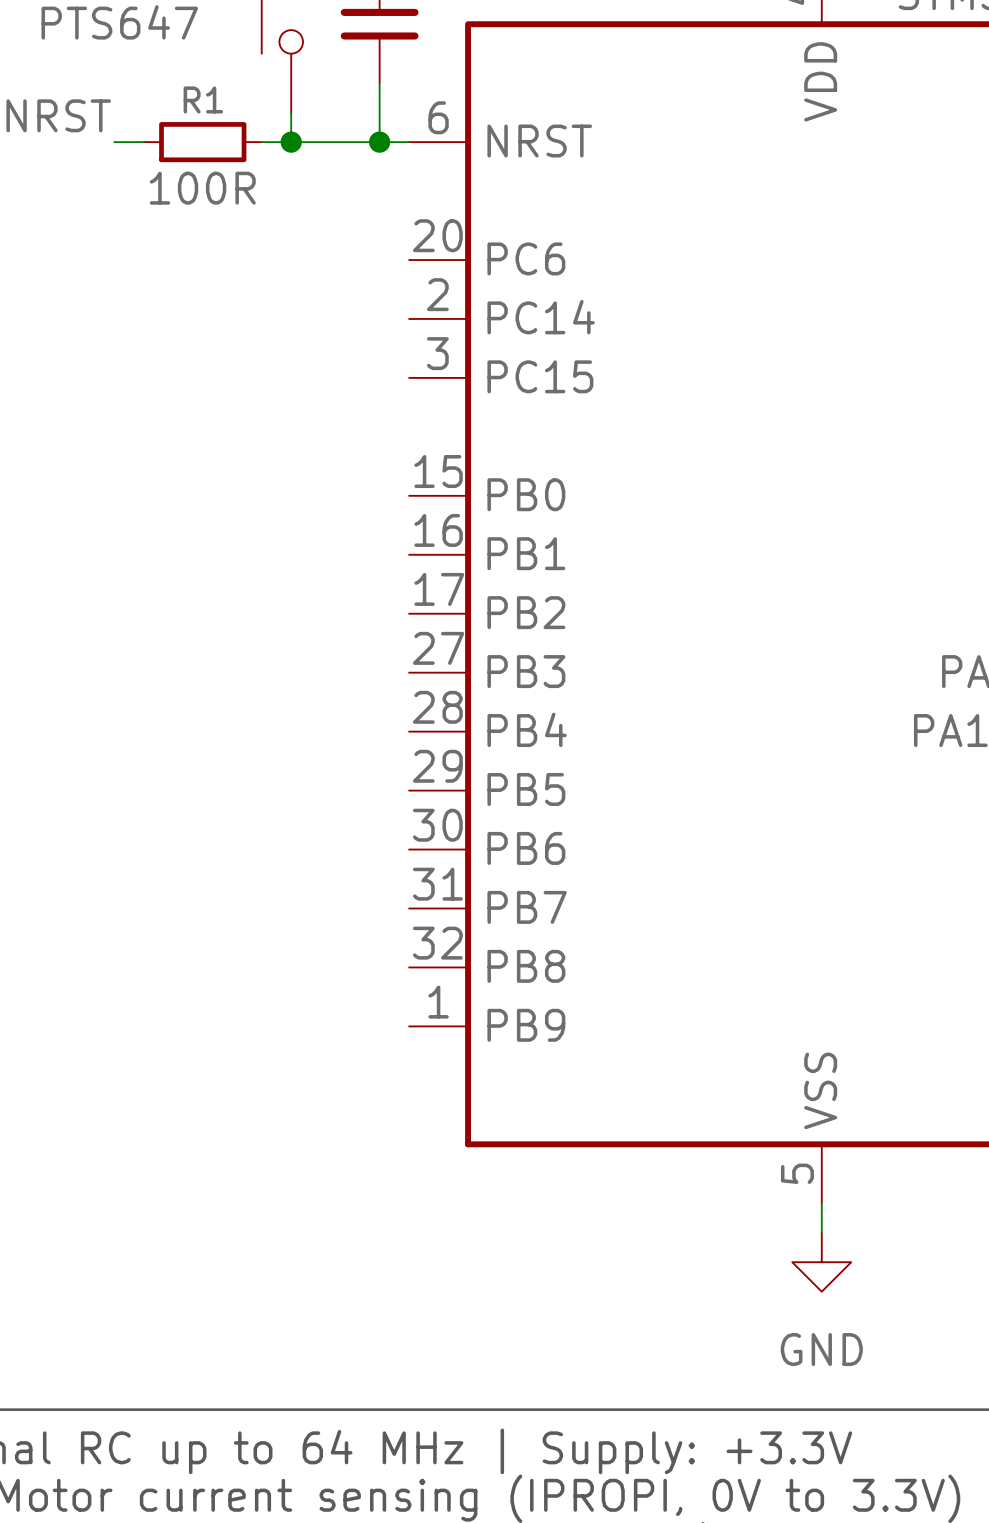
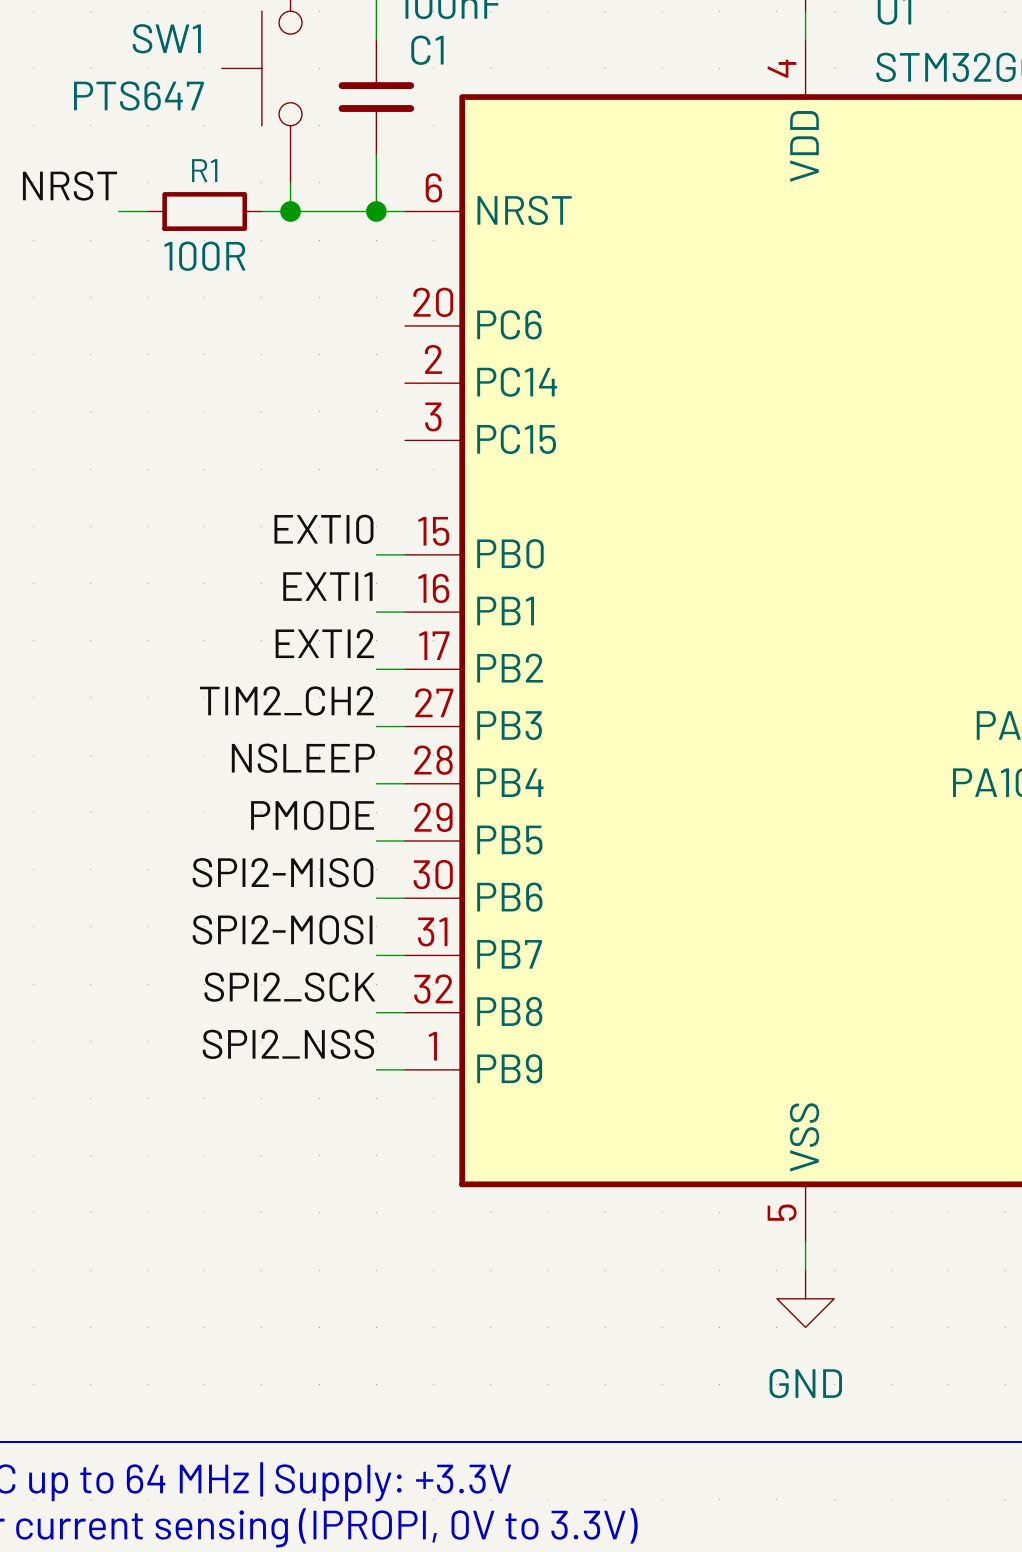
label: none -> EXTI0 (323, 529)
wire: none -> (376, 554) (404, 554)
label: none -> EXTI1 (327, 586)
wire: none -> (376, 612) (404, 612)
label: none -> EXTI2 (324, 643)
wire: none -> (376, 669) (404, 669)
label: none -> TIM2_CH2 (286, 701)
wire: none -> (376, 726) (404, 726)
label: none -> NSLEEP (303, 758)
wire: none -> (376, 783) (404, 783)
label: none -> PMODE (312, 815)
wire: none -> (376, 840) (404, 840)
label: none -> SPI2-MISO (283, 872)
wire: none -> (376, 898) (404, 898)
label: none -> SPI2-MOSI (282, 929)
wire: none -> (376, 955) (404, 955)
label: none -> SPI2_SCK (289, 987)
wire: none -> (376, 1012) (404, 1012)
label: none -> SPI2_NSS (288, 1044)
wire: none -> (376, 1069) (404, 1069)

